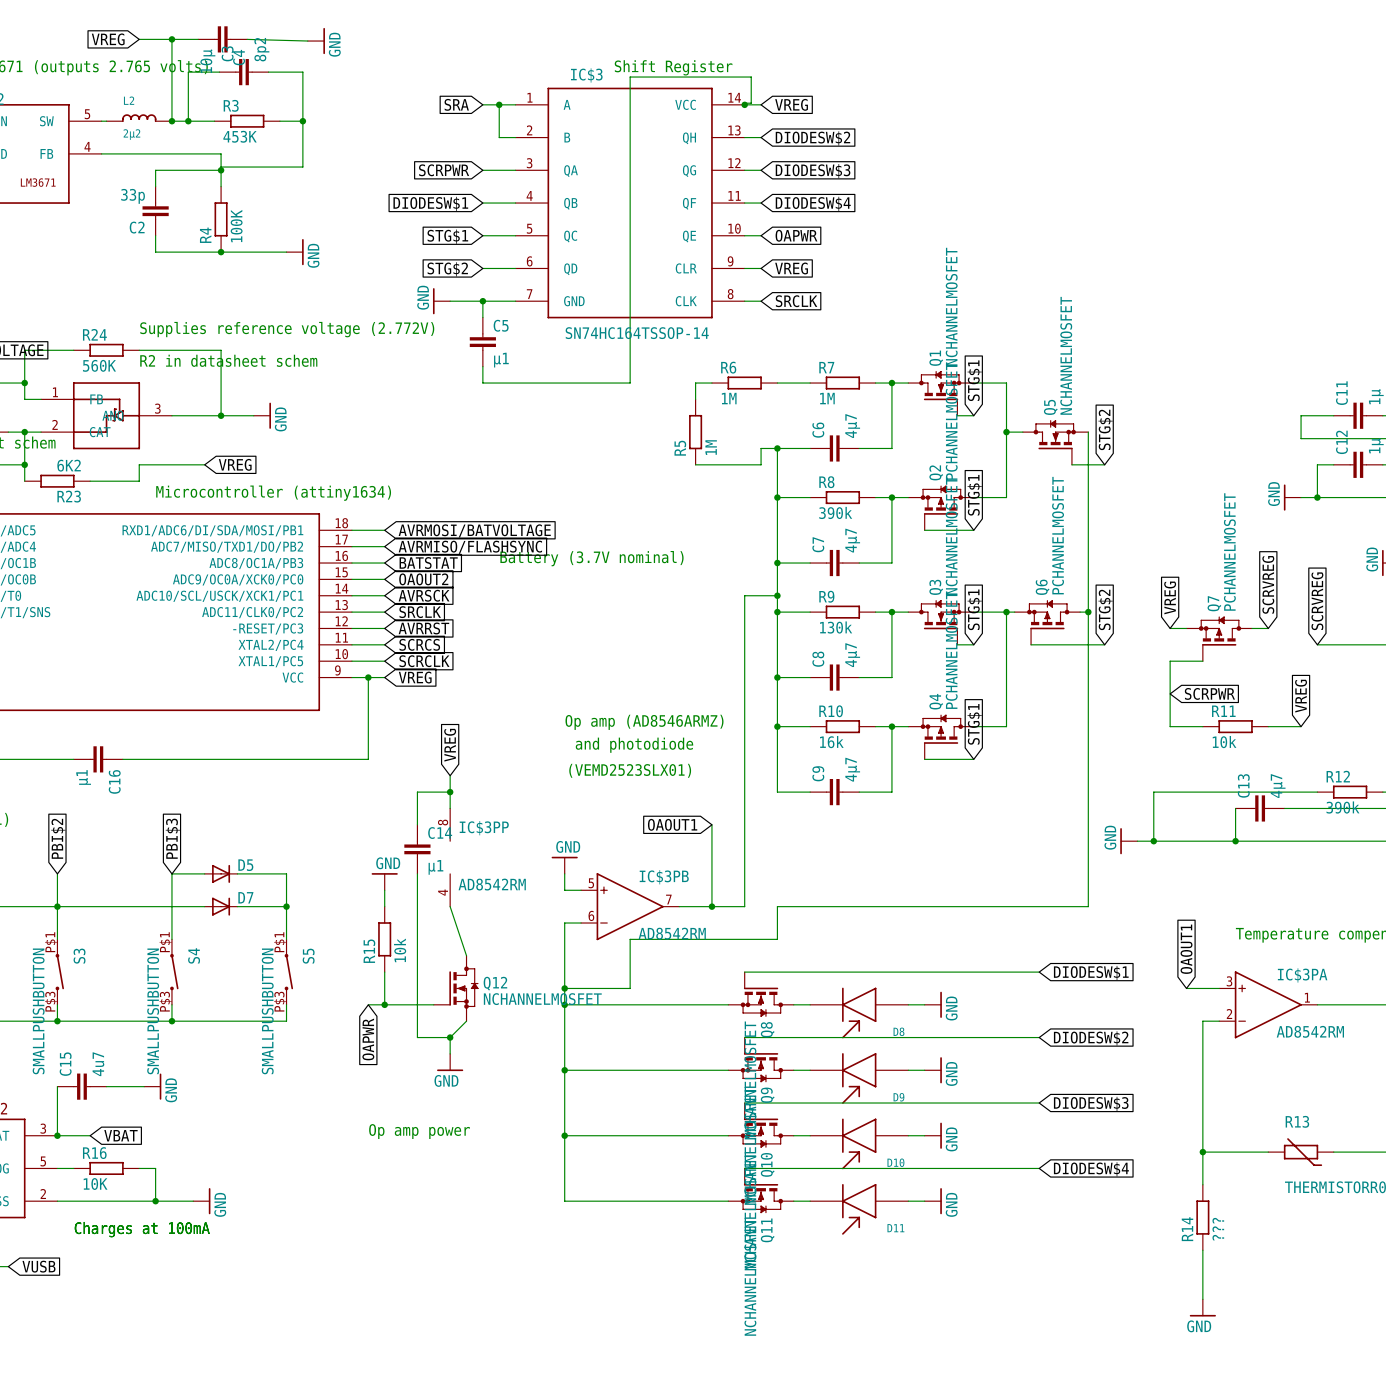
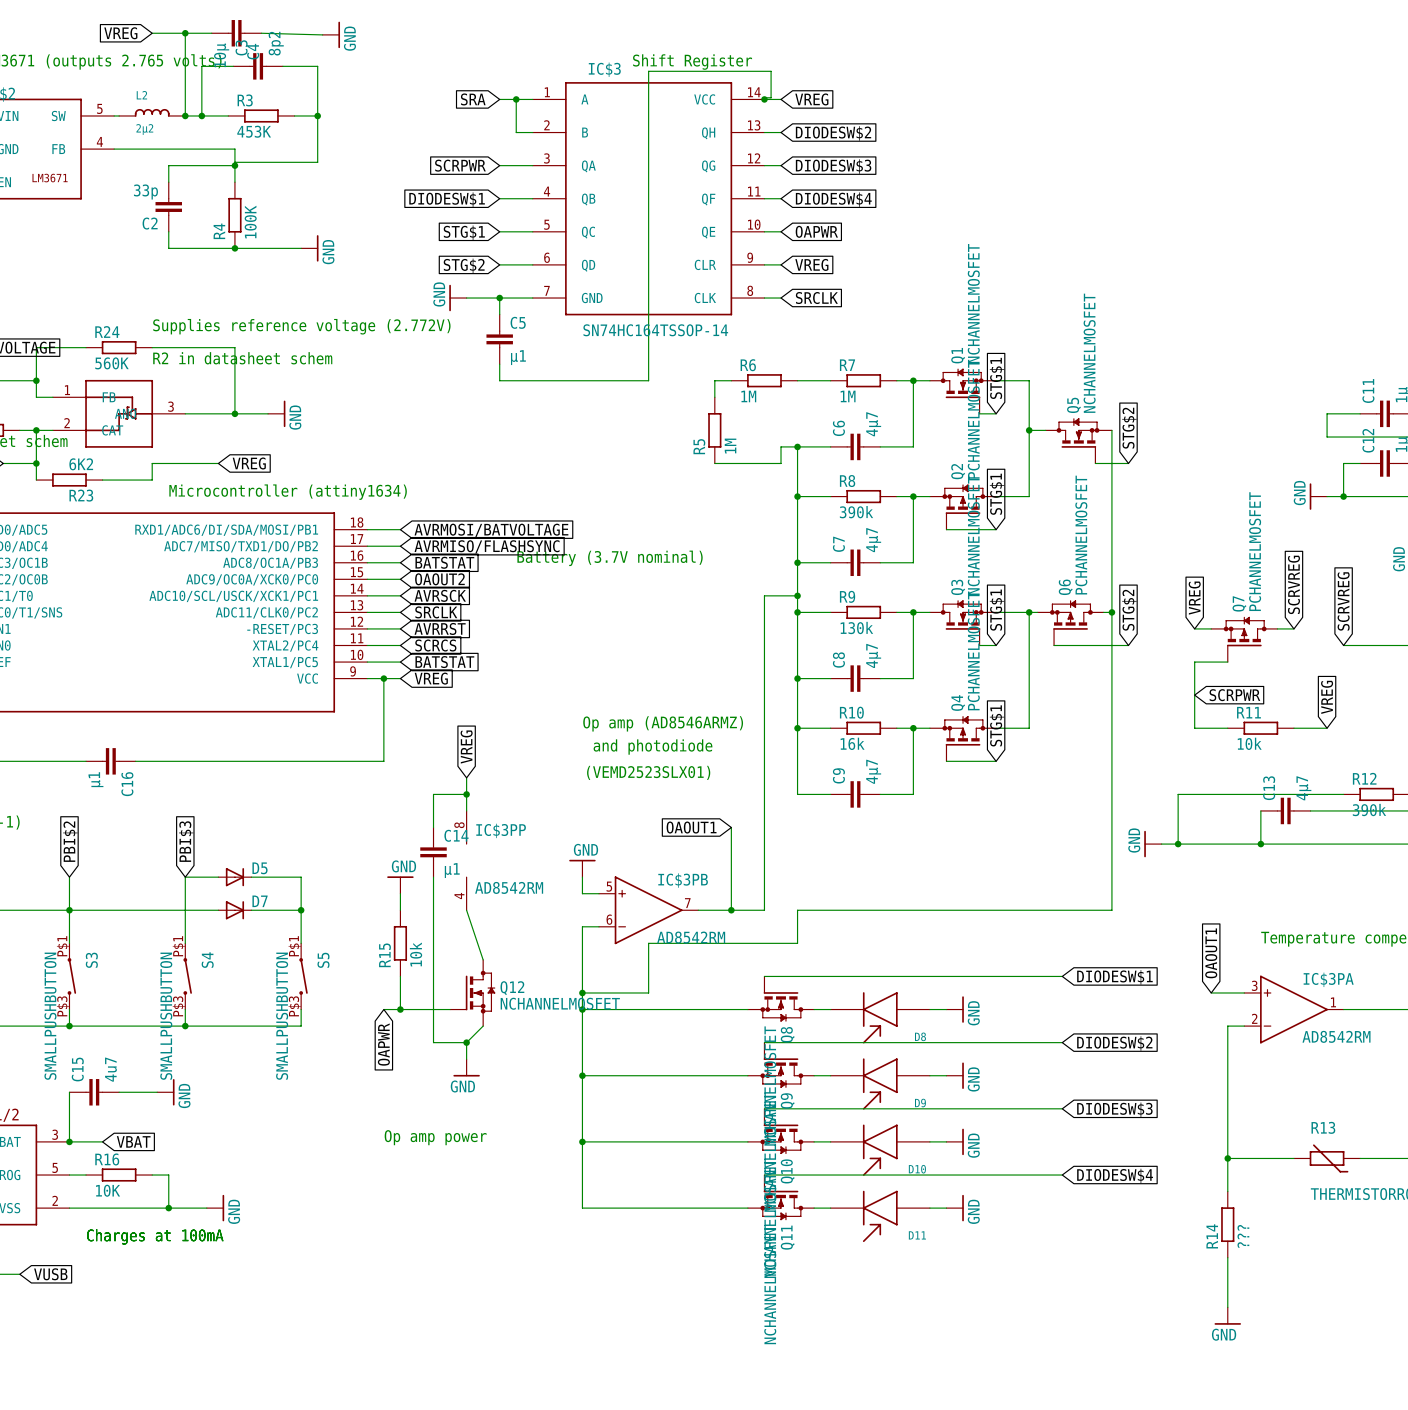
global label: SCRCLK (424, 661) -> BATSTAT (444, 662)

